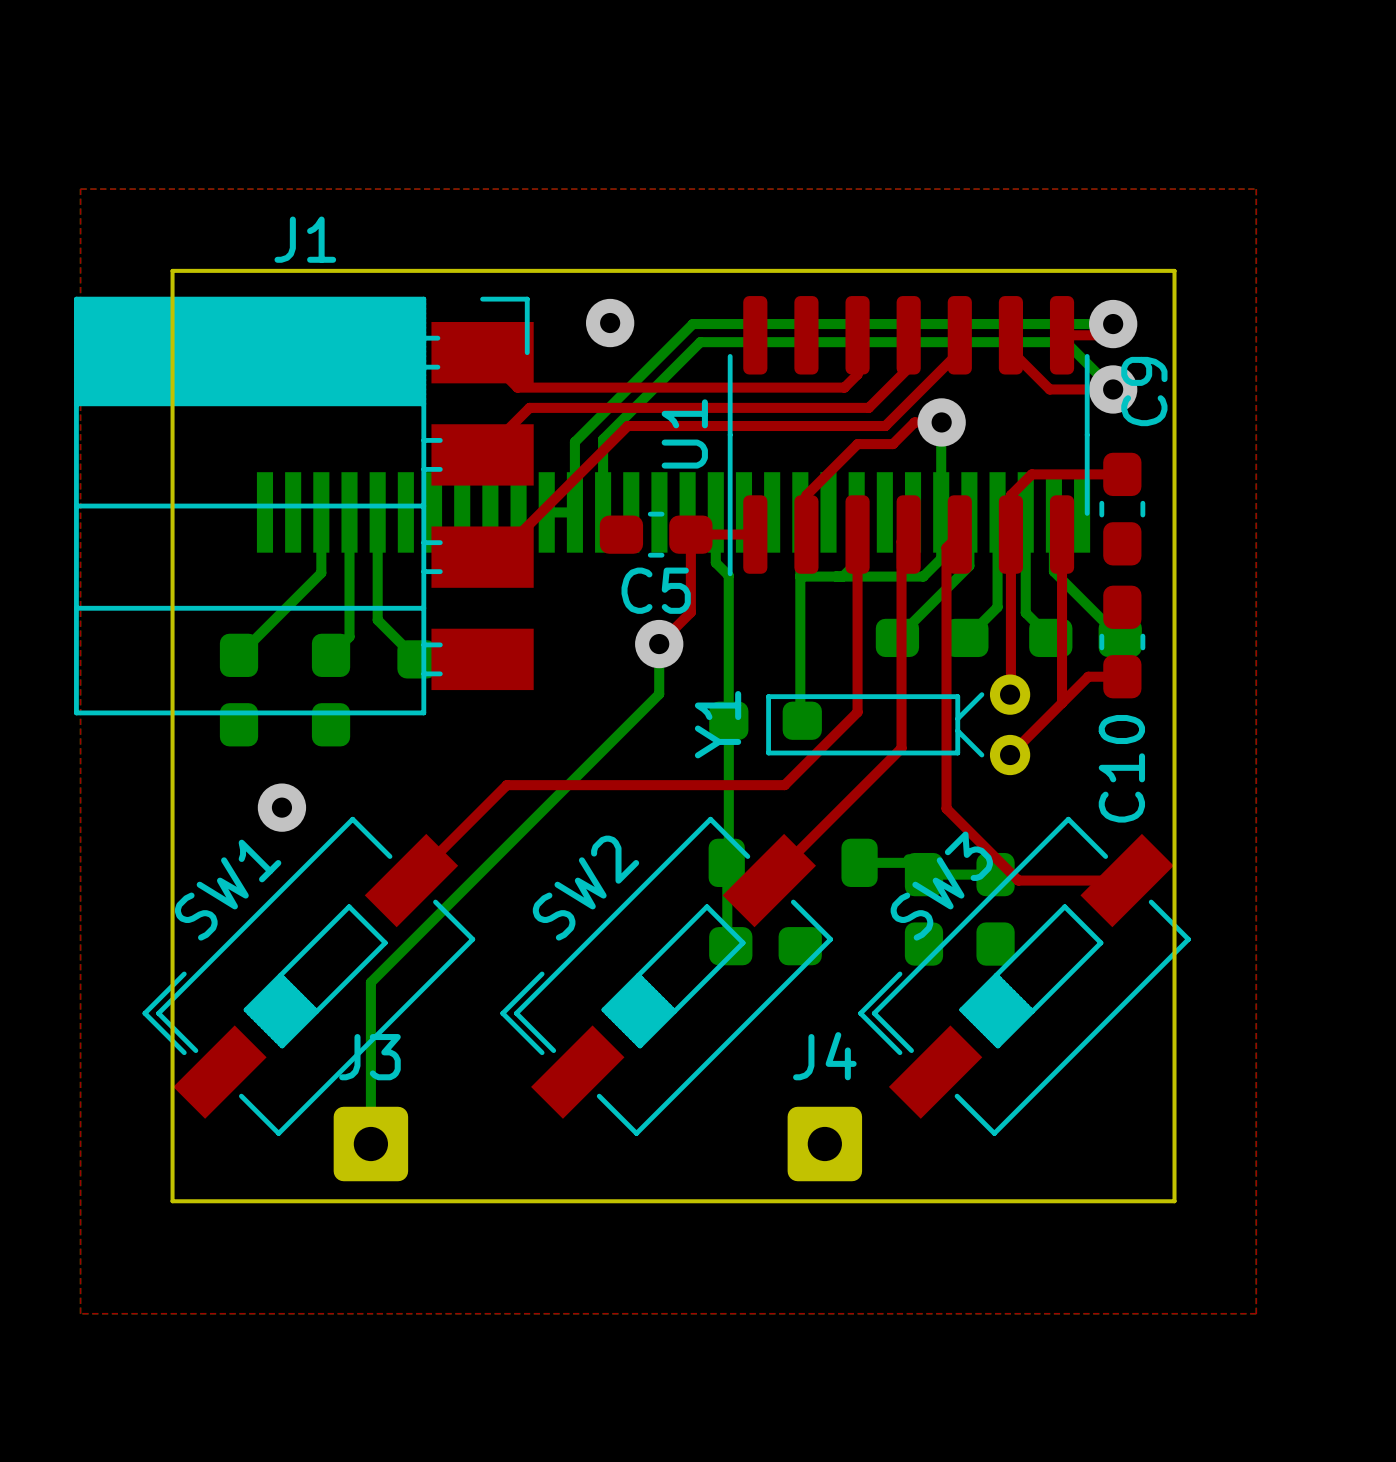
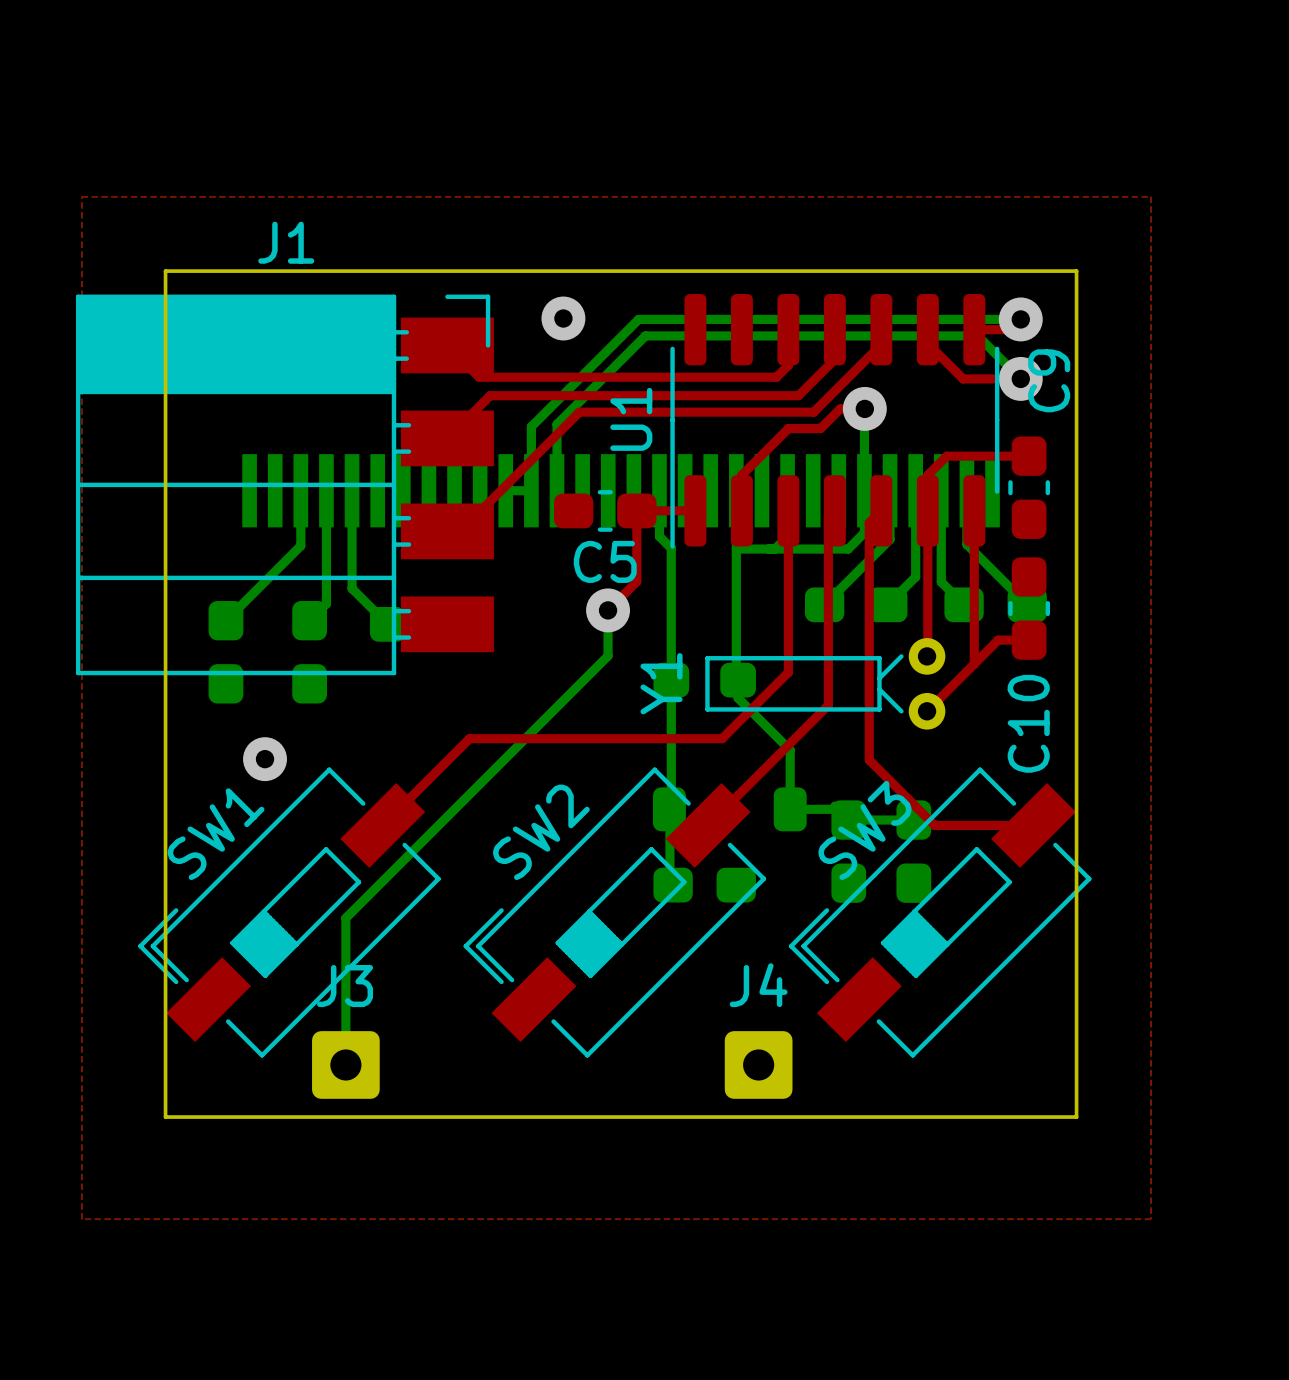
bottom track: none -> (738, 680) (738, 698) (790, 750) (790, 809)

